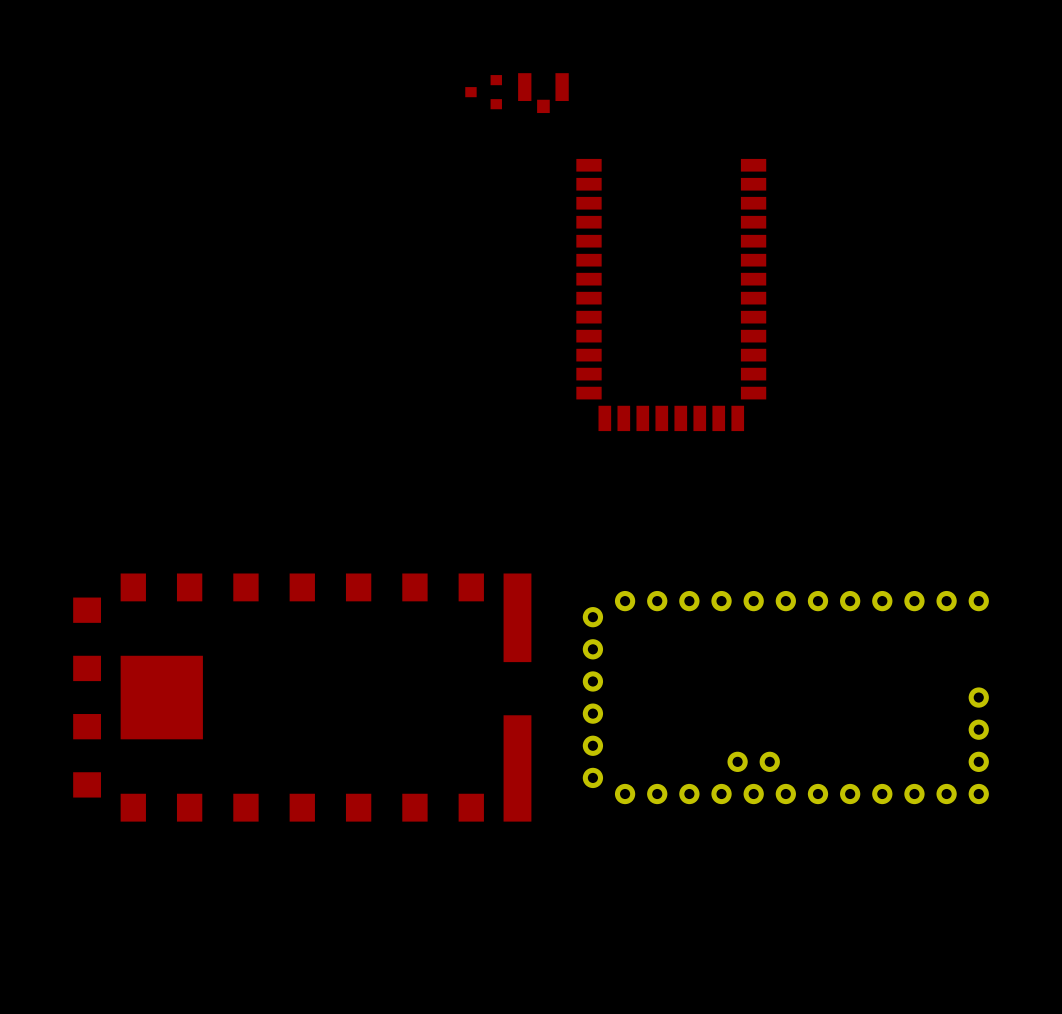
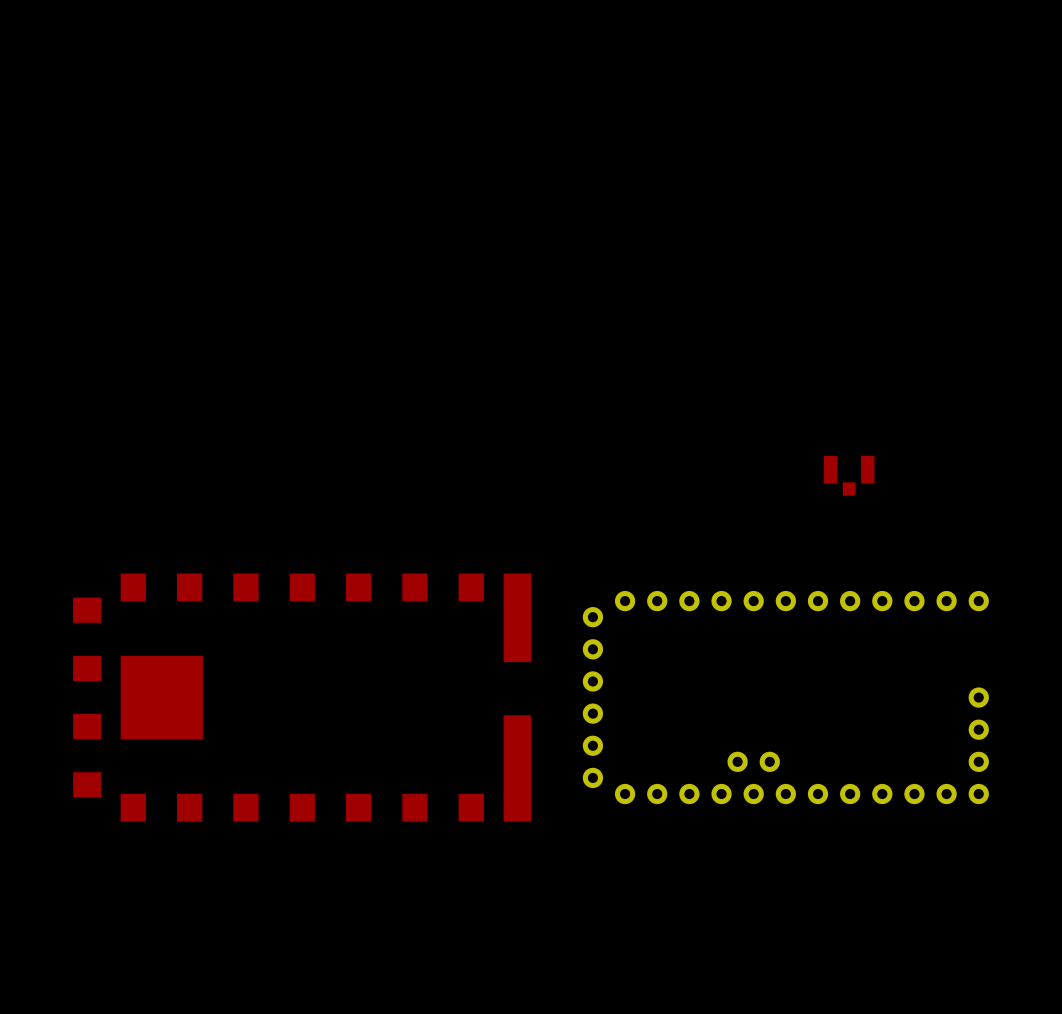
part: (483, 92) -> none
part: (543, 93) -> none
part: (671, 295) -> none
part: none -> (849, 475)

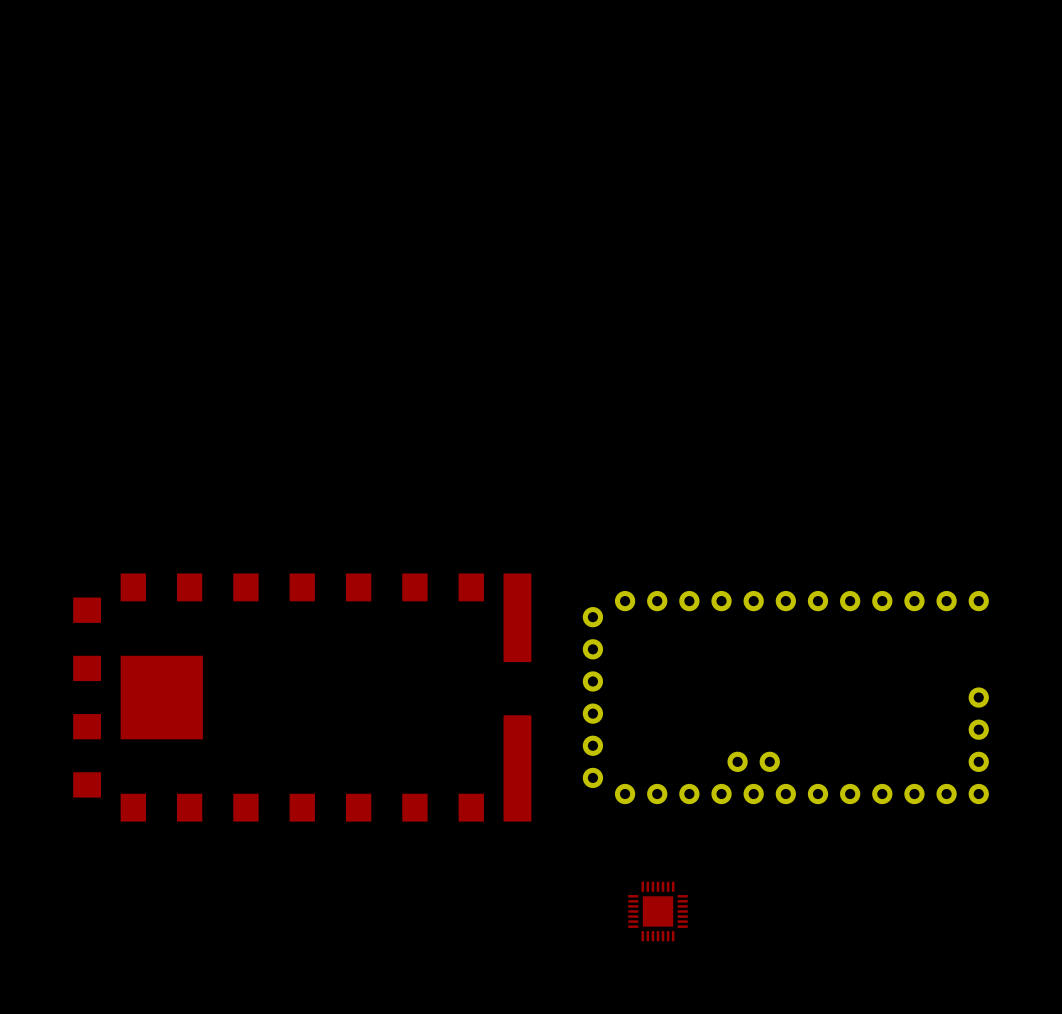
part: (849, 475) -> none
part: none -> (657, 911)

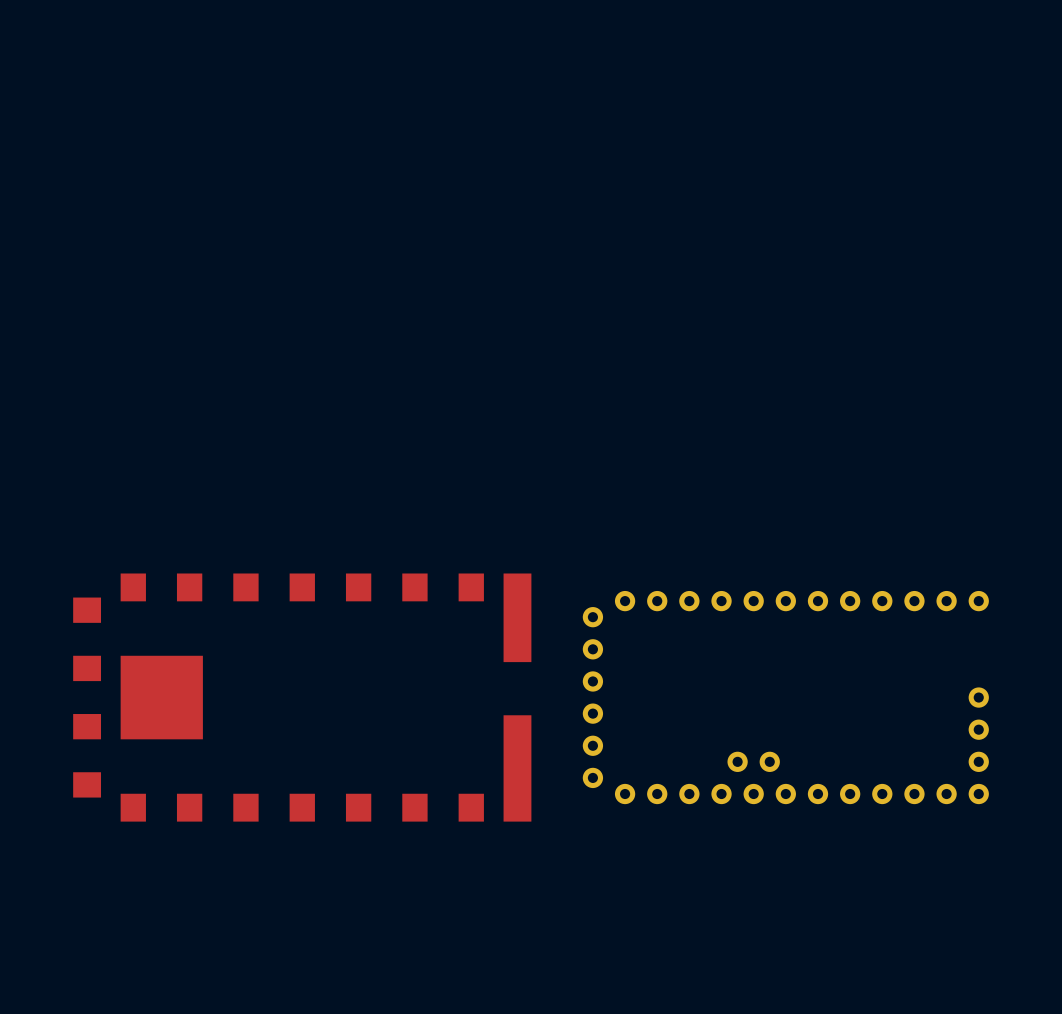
part: (657, 911) -> none

